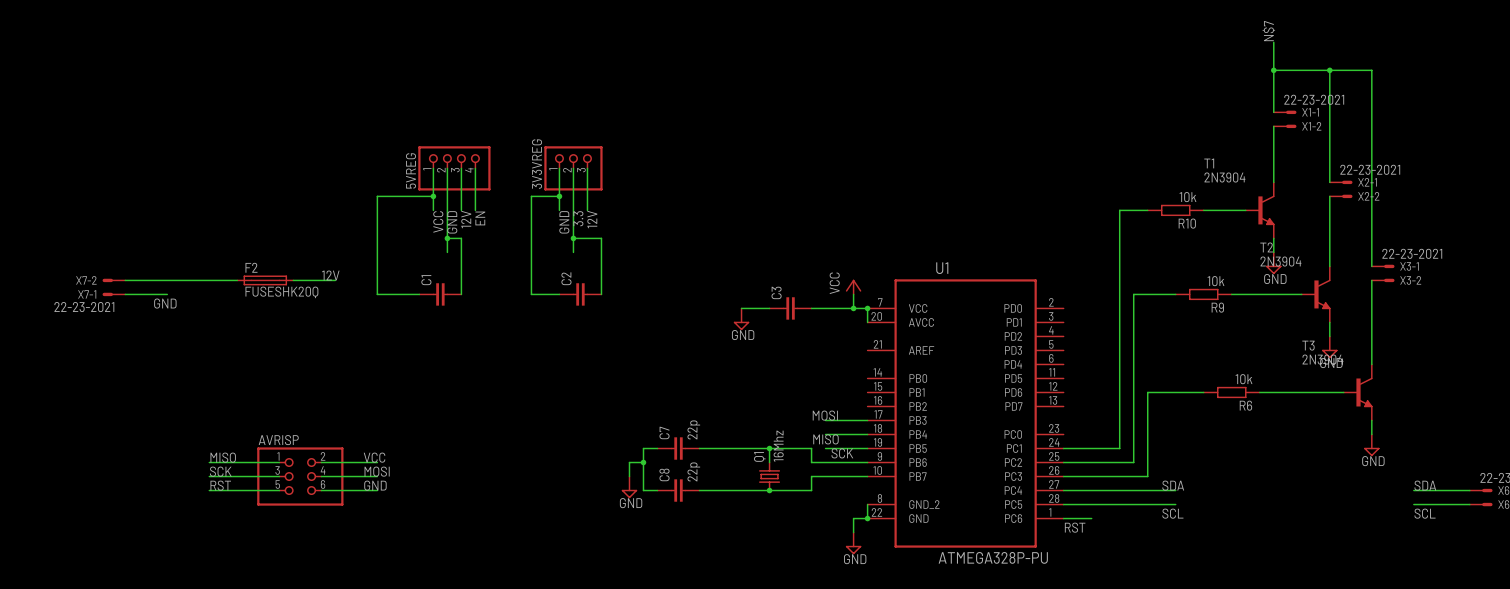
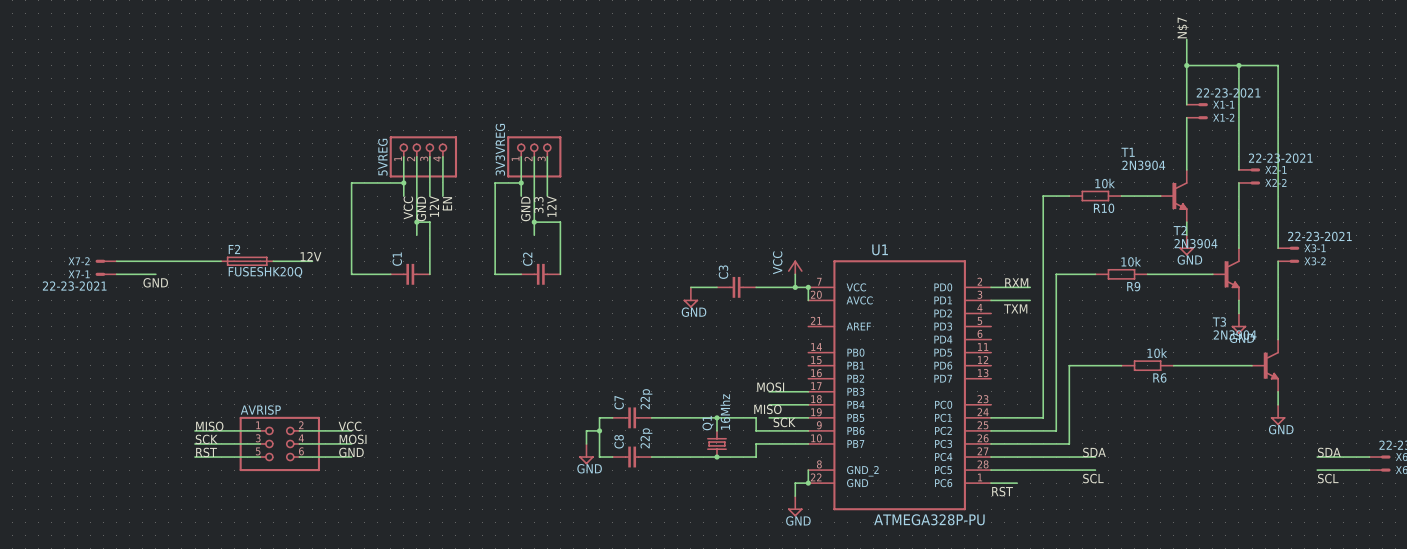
label: none -> RXM (1016, 282)
wire: none -> (991, 287) (1030, 287)
wire: none -> (991, 300) (1030, 300)
label: none -> TXM (1015, 308)

